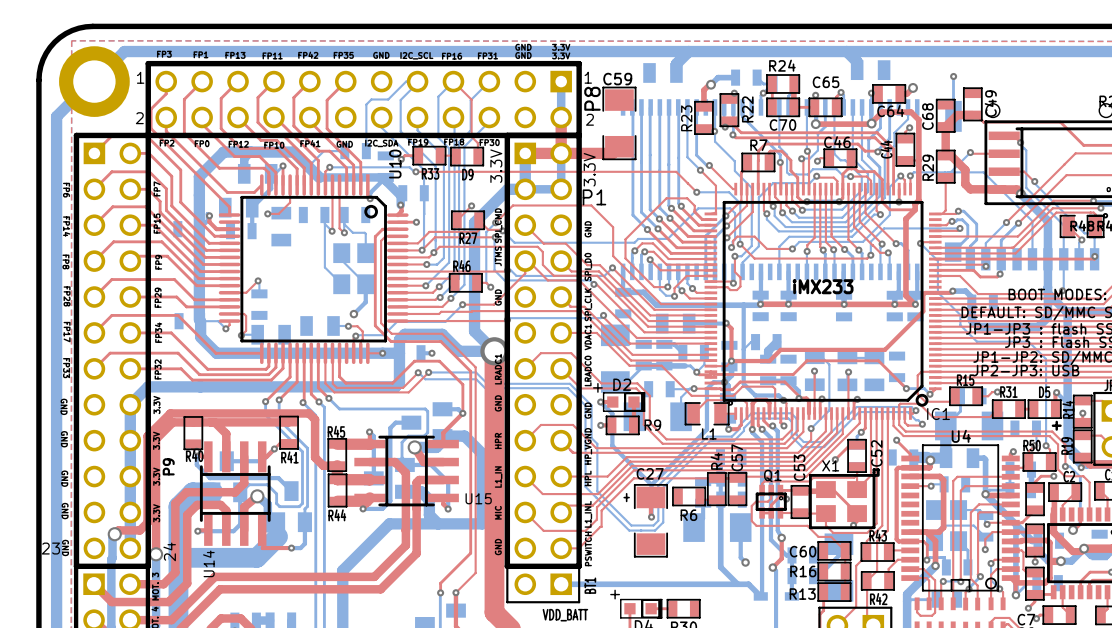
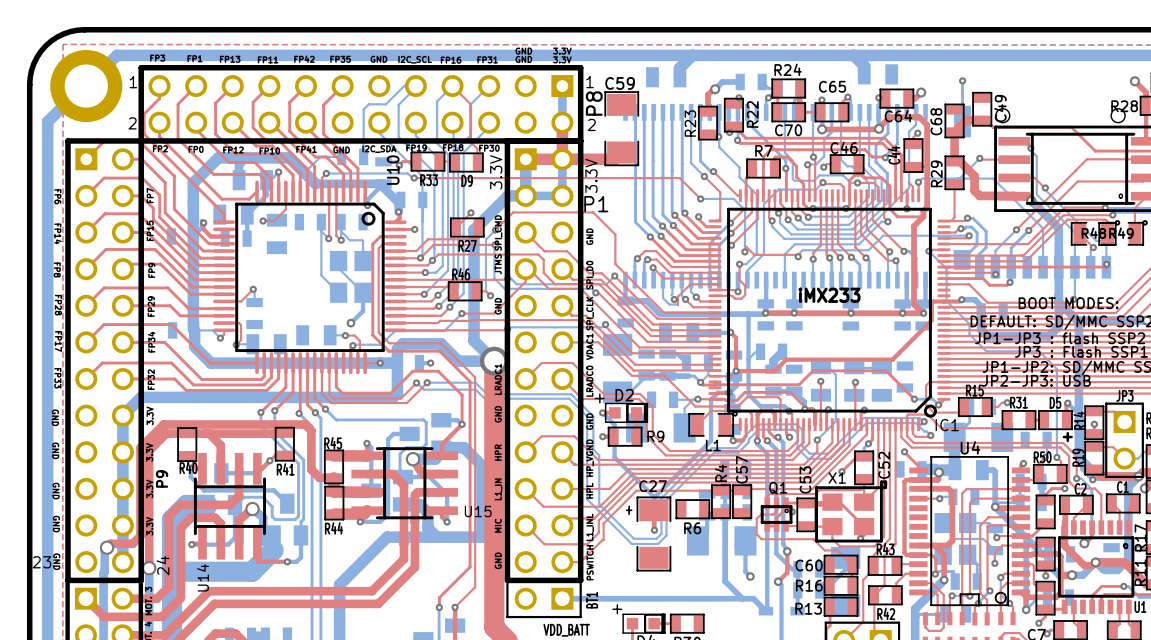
bottom track: (908, 119) (894, 132) (894, 146) (884, 155) (884, 197) -> (916, 124) (909, 131) (909, 187) (892, 204)
bottom track: (900, 176) (889, 186) (889, 215) (862, 241) (799, 241) (792, 248) -> none
via: (900, 176) -> none
top track: (694, 209) (694, 205) (687, 198) (666, 198) (625, 239) (625, 258) (654, 287) (667, 287) -> none
via: none -> (698, 216)
top track: (478, 220) (488, 229) (502, 230) -> none
bottom track: (960, 228) (884, 228) (870, 241) (870, 255) -> (969, 235) (883, 235) (868, 250) (802, 250) (798, 254)
bottom track: (502, 230) (514, 242) (634, 242) (638, 238) (667, 238) (698, 208) (730, 208) (735, 213) (735, 239) (731, 247) -> none
via: (502, 230) -> none
top track: none -> (745, 245) (754, 254) (798, 254)
top track: (740, 244) (754, 258) (867, 258) (871, 255) -> none
top track: (731, 247) (733, 240) (737, 236) (754, 236) (767, 248) (792, 248) -> none
via: (731, 247) -> none
via: (870, 255) -> none
via: (667, 286) -> none
via: none -> (674, 299)
via: (674, 296) -> none

